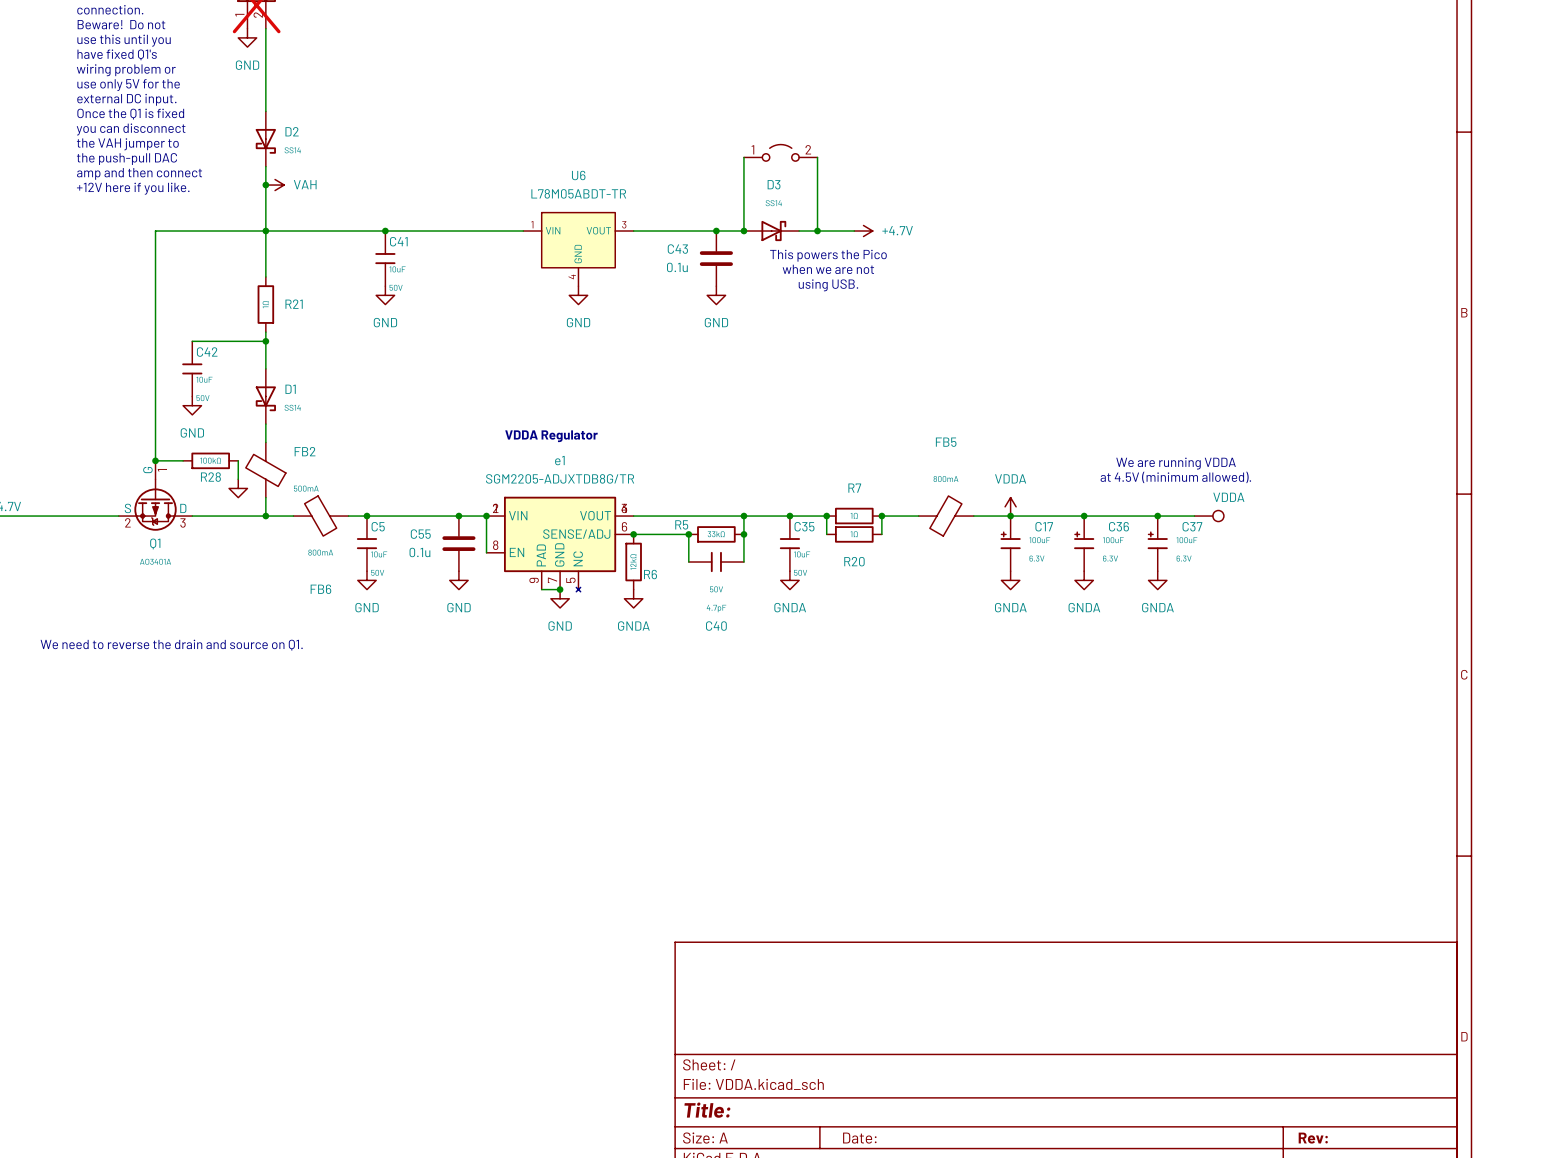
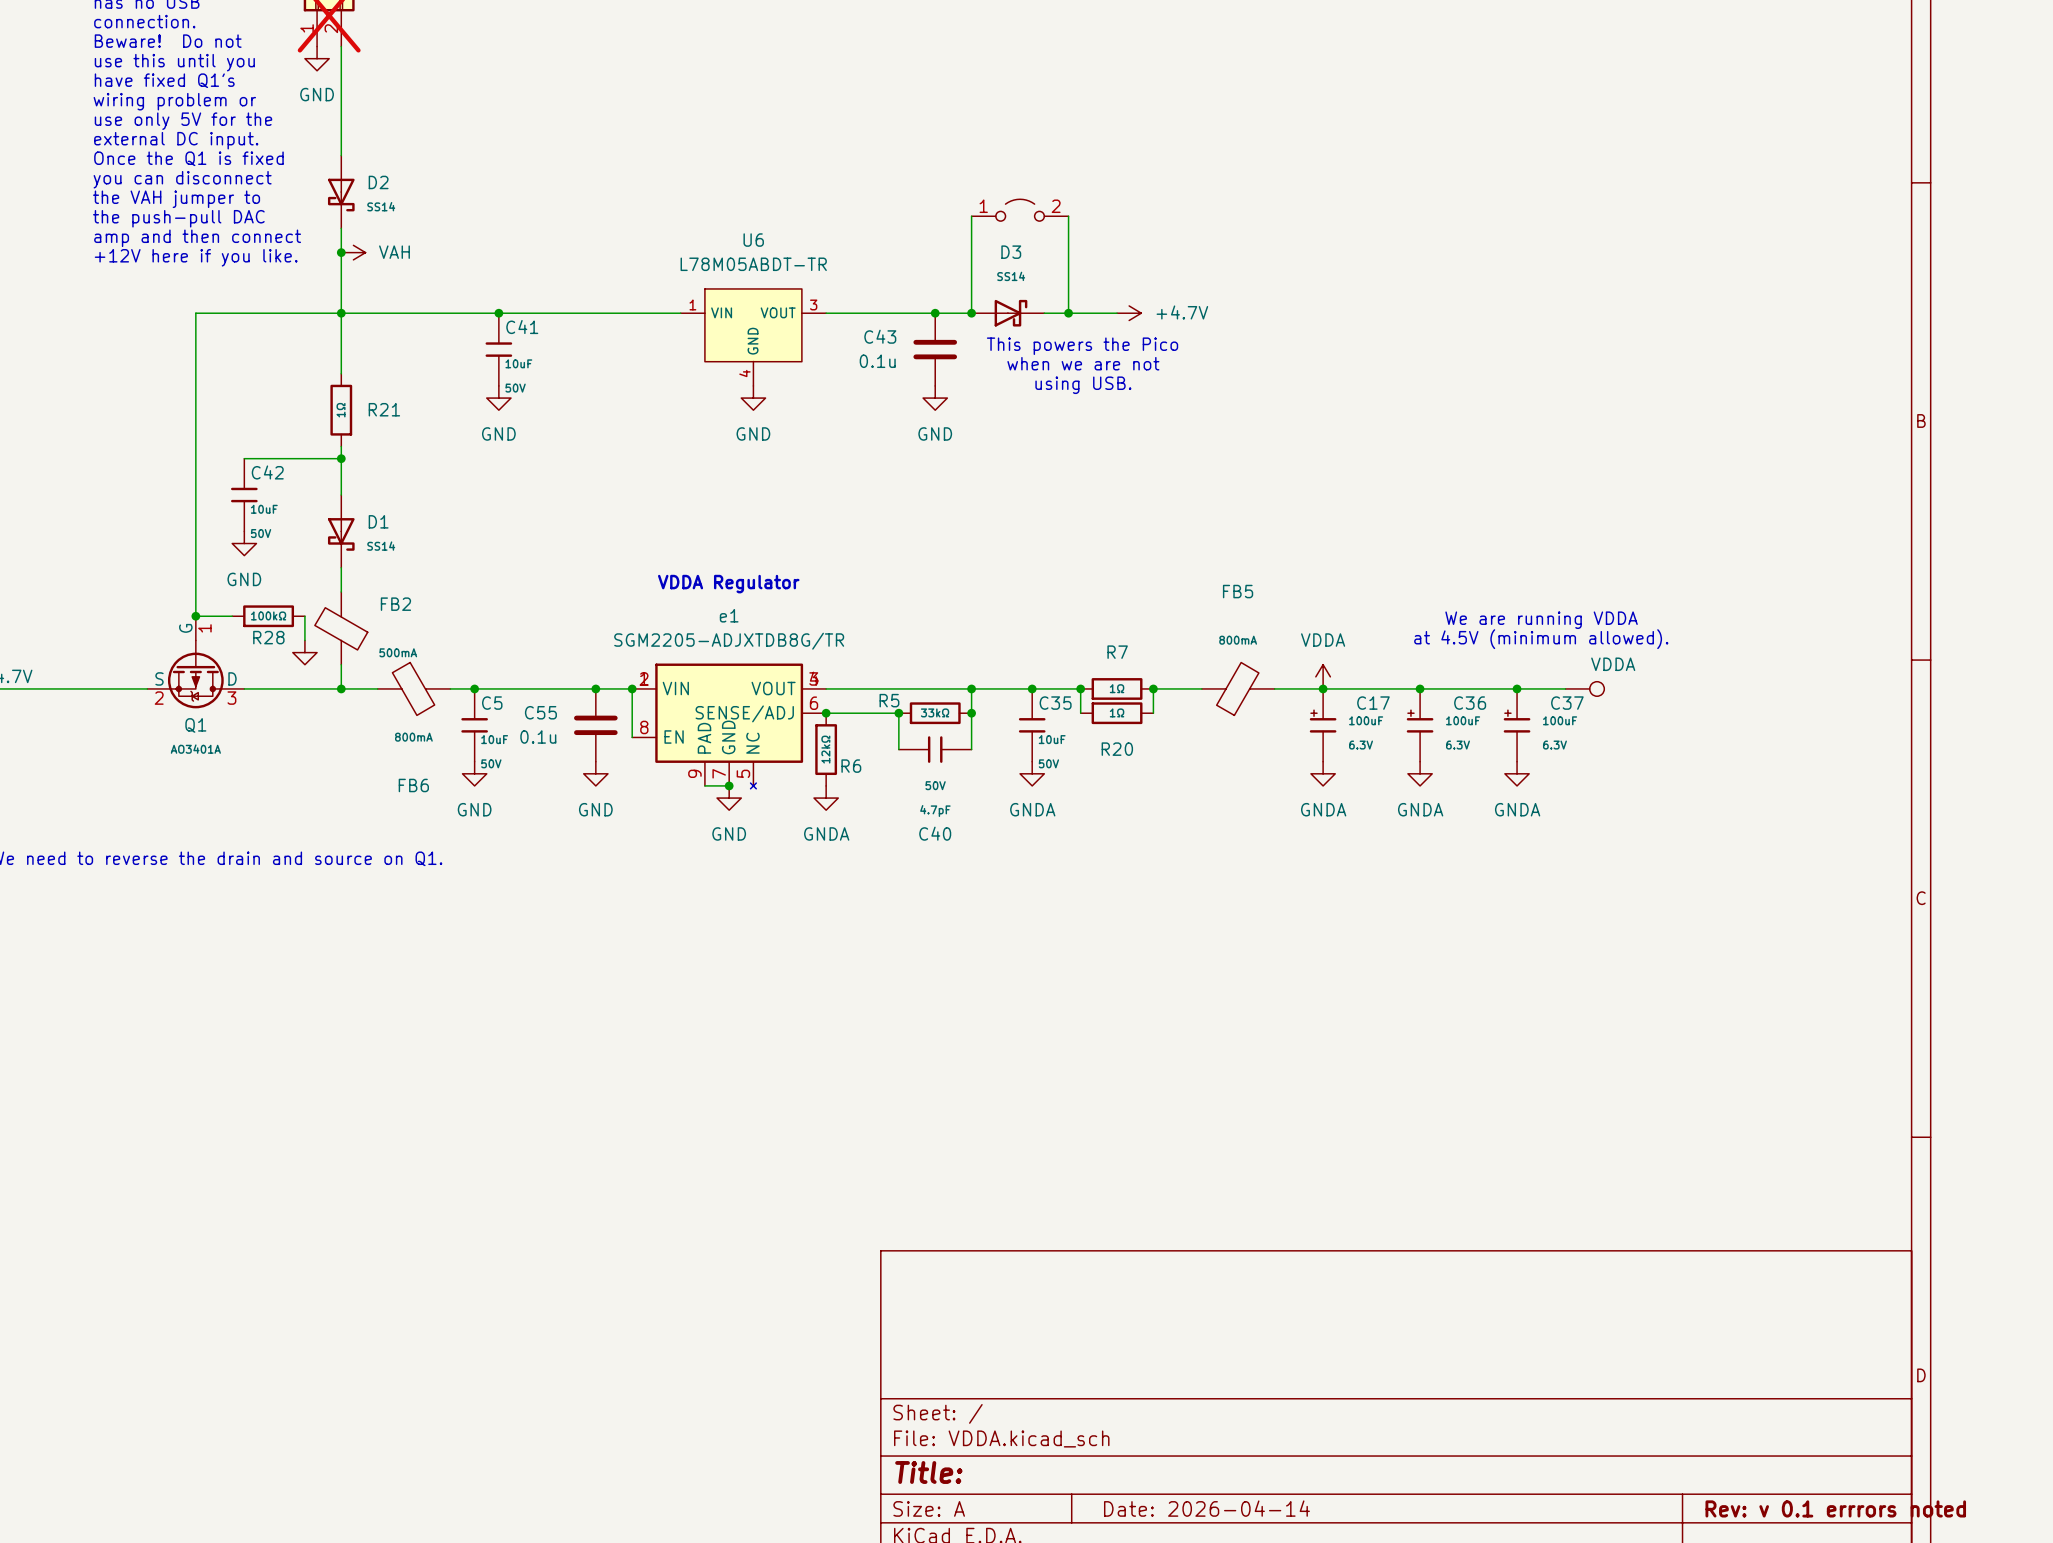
title block: Date: (859, 1138) -> Date: 2026-04-14 (1206, 1508)
title block: Rev: (1313, 1138) -> Rev: v 0.1 errrors noted (1835, 1508)

